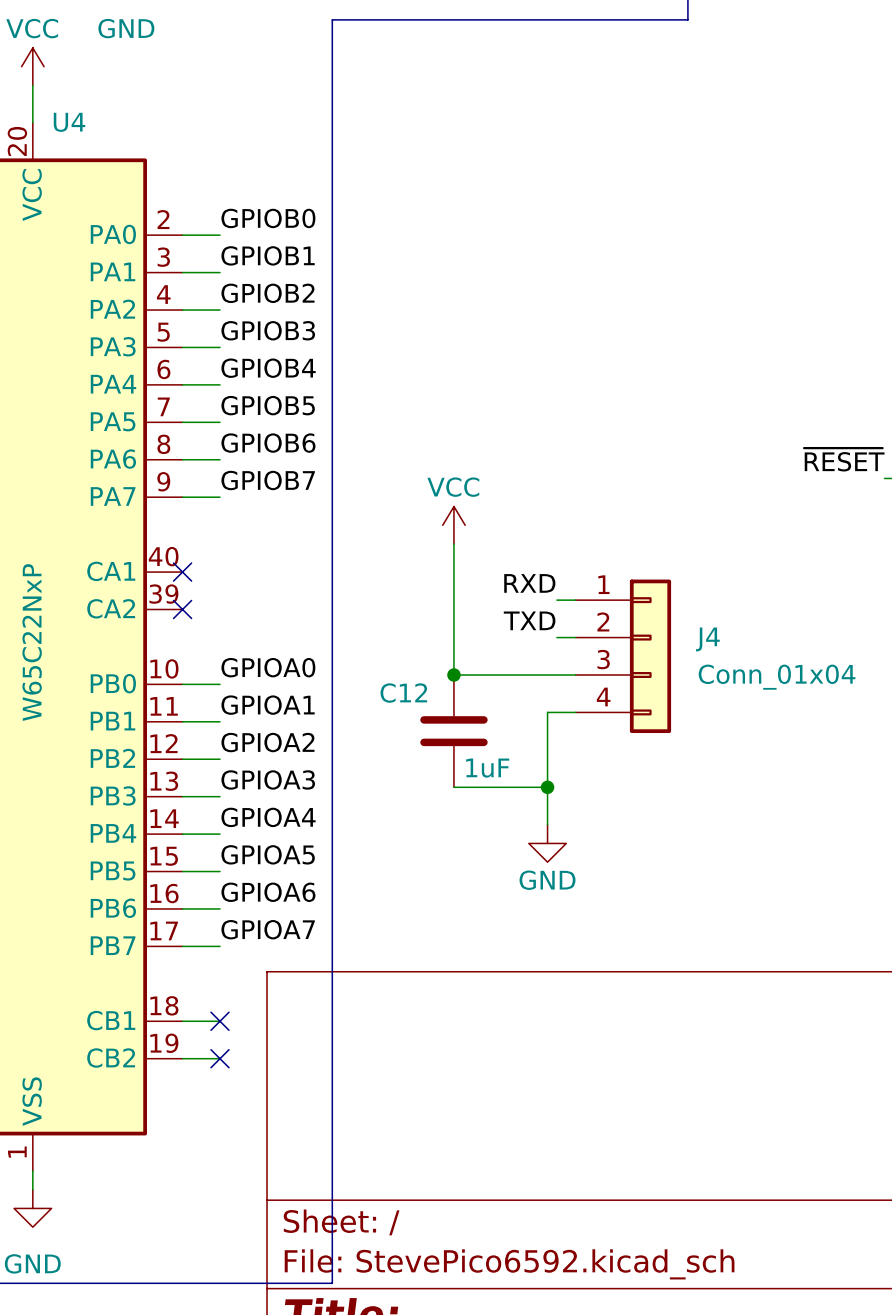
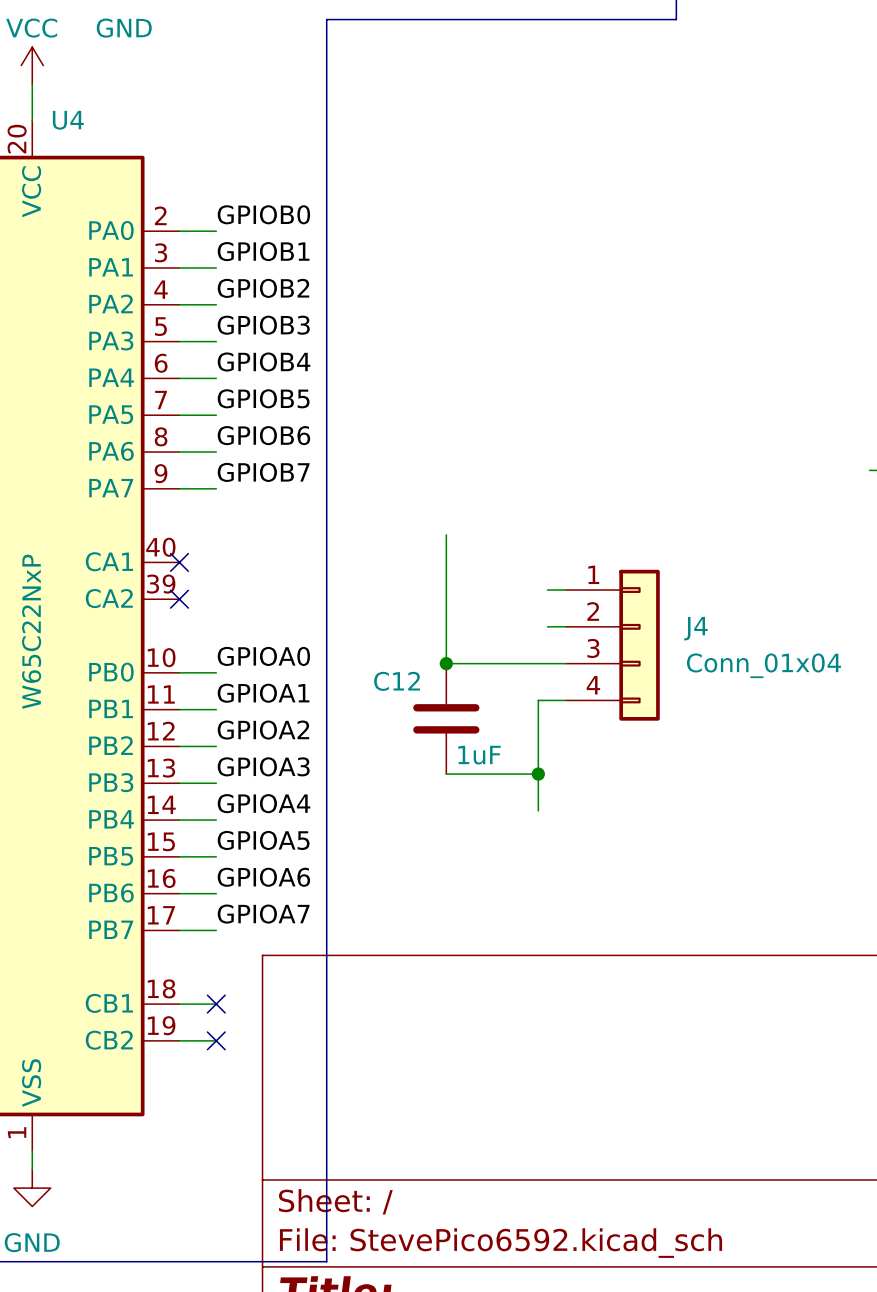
label: ~{RESET} (844, 459) -> none
power symbol: VCC (453, 525) -> none
label: RXD (529, 583) -> none
label: TXD (529, 620) -> none
power symbol: GND (547, 843) -> none

